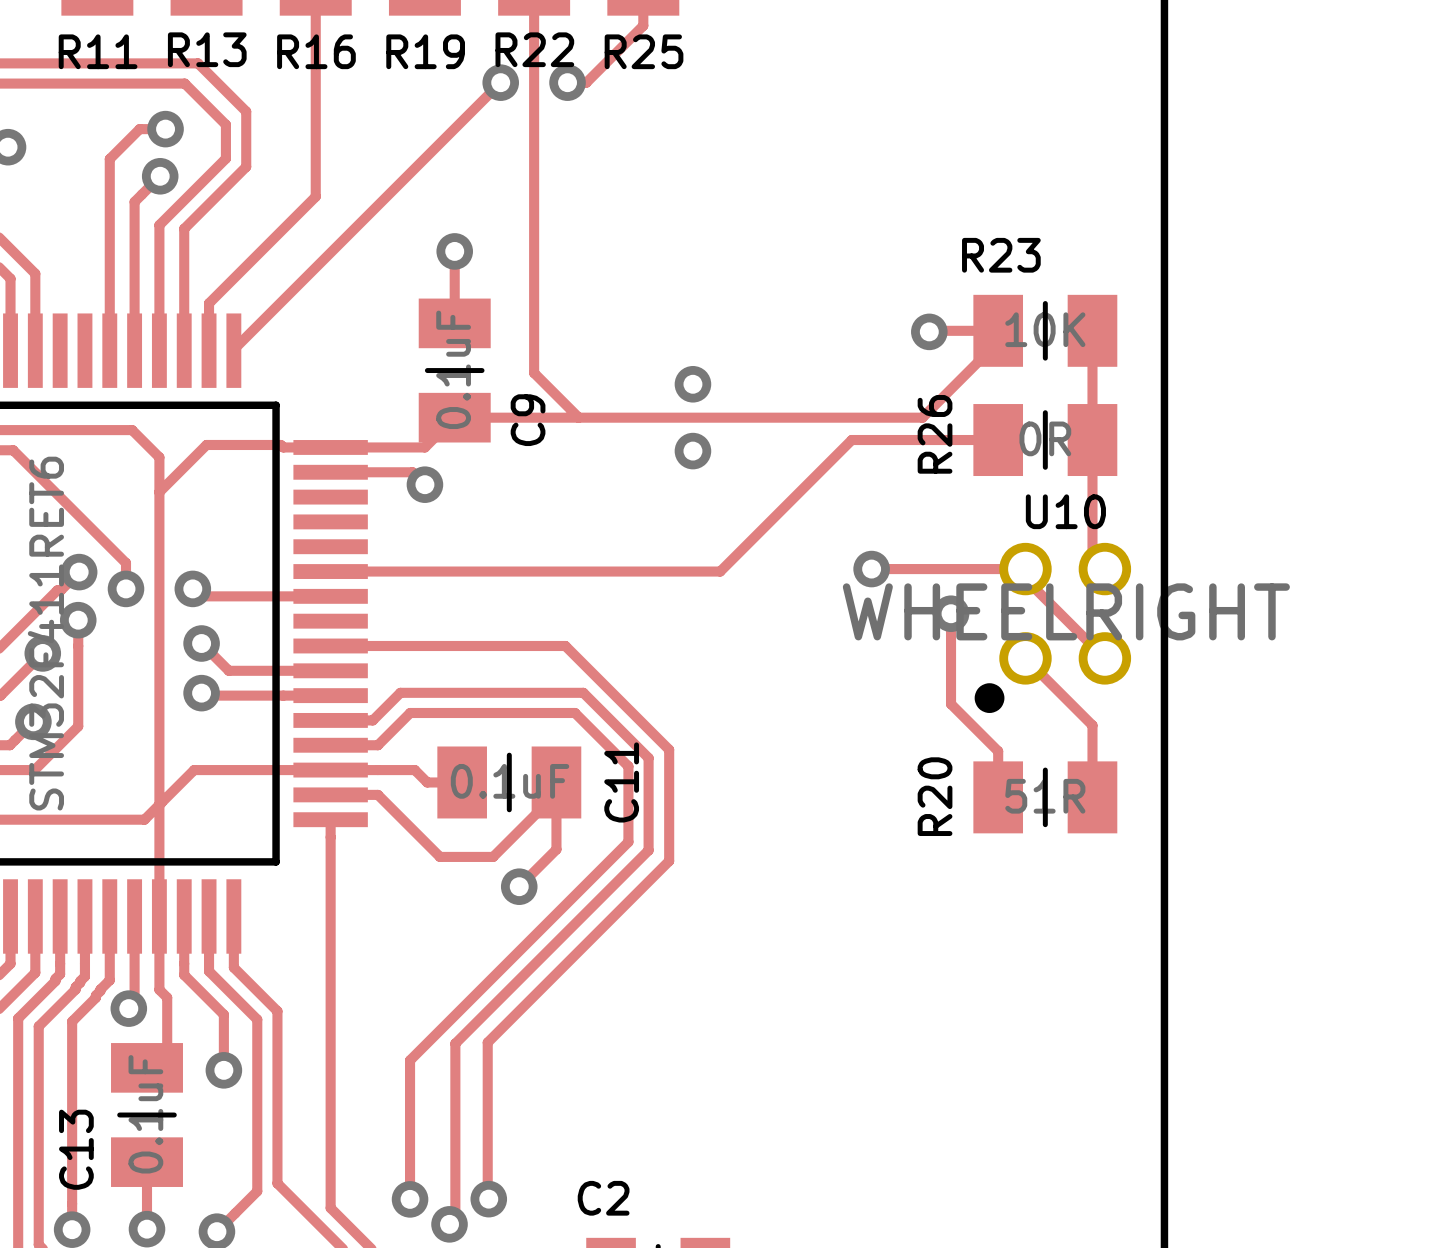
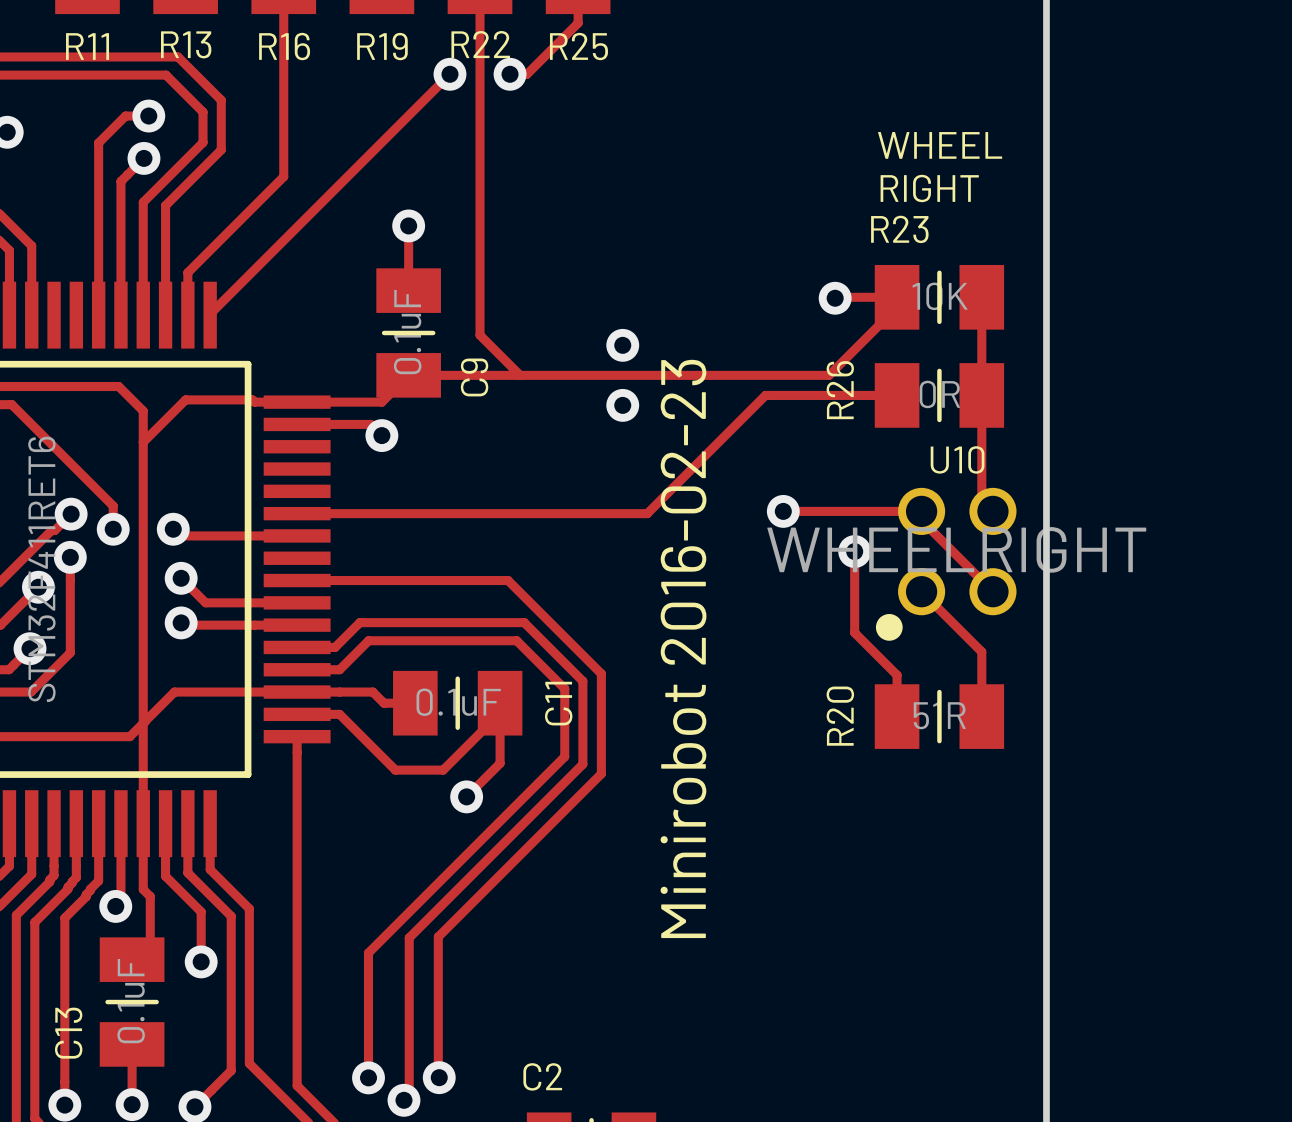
text: none -> WHEEL (940, 145)
text: none -> RIGHT (929, 188)
text: none -> Minirobot 2016-02-23 (683, 648)

